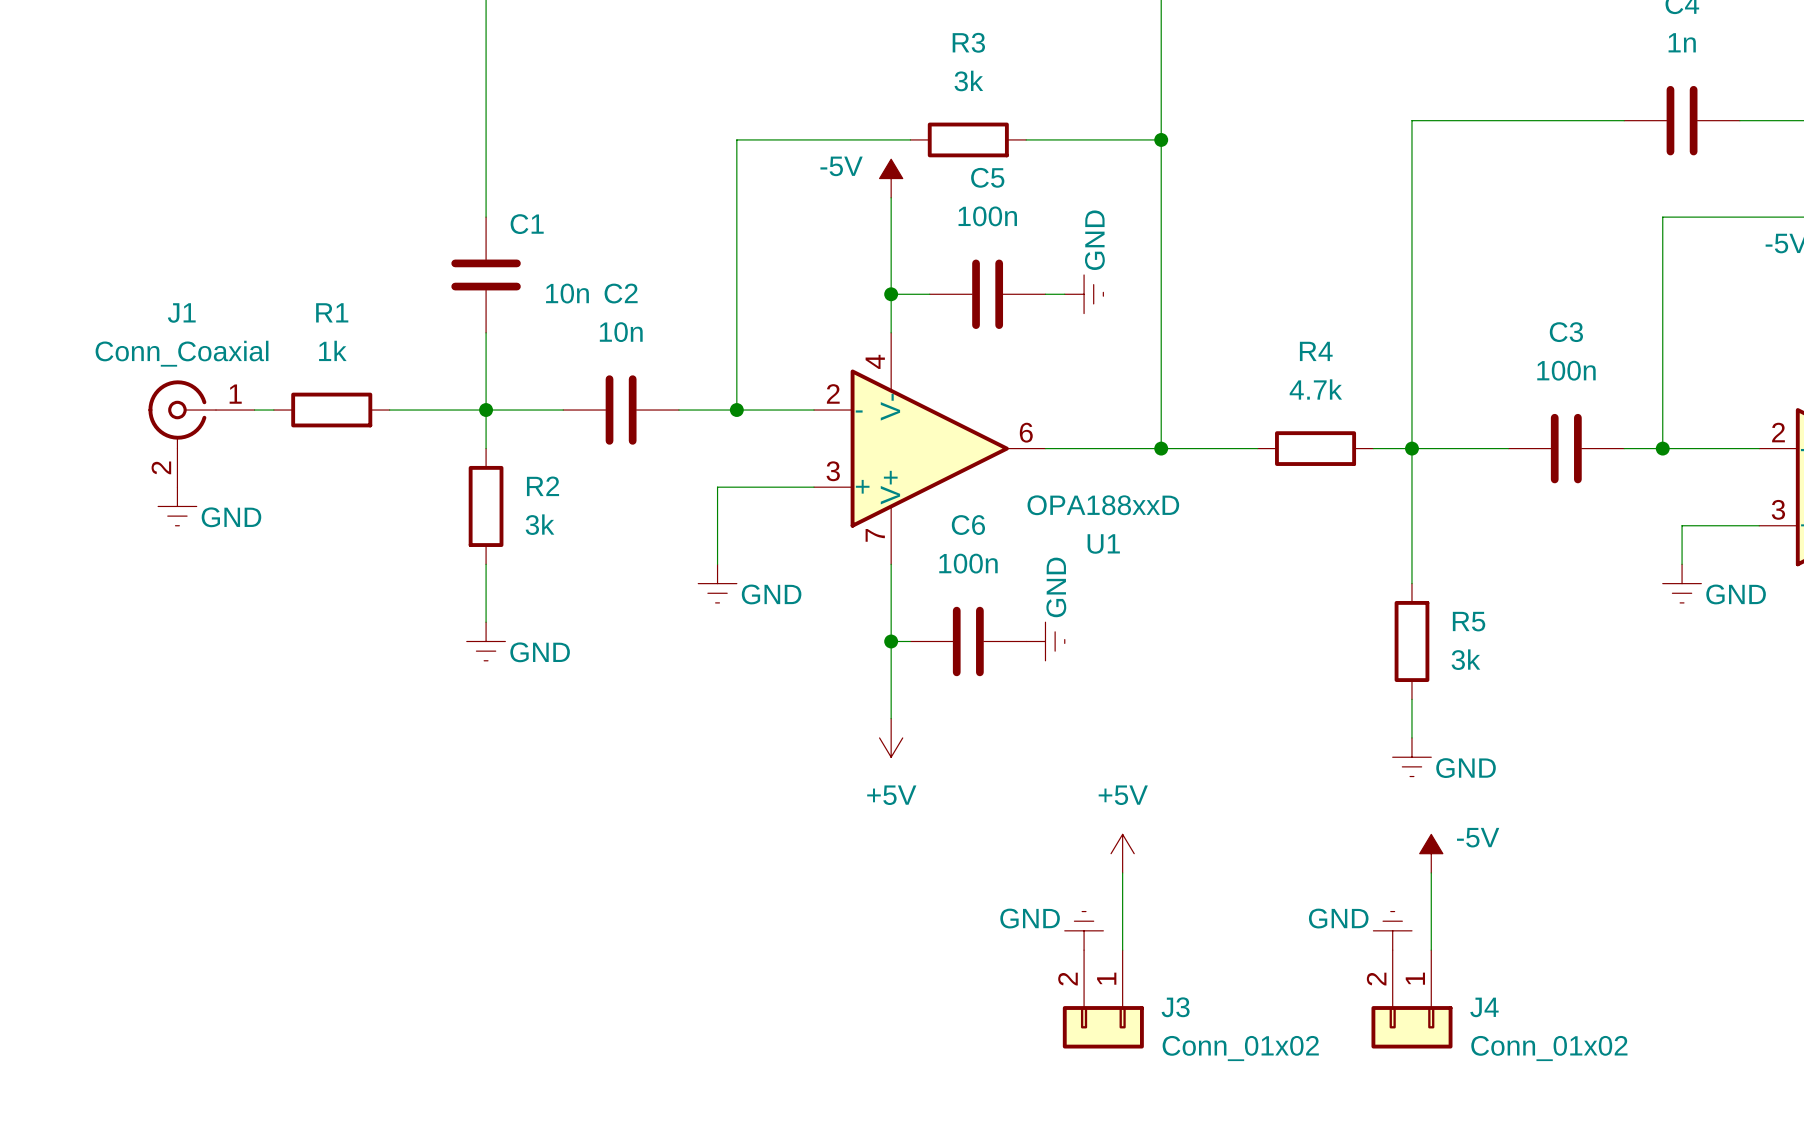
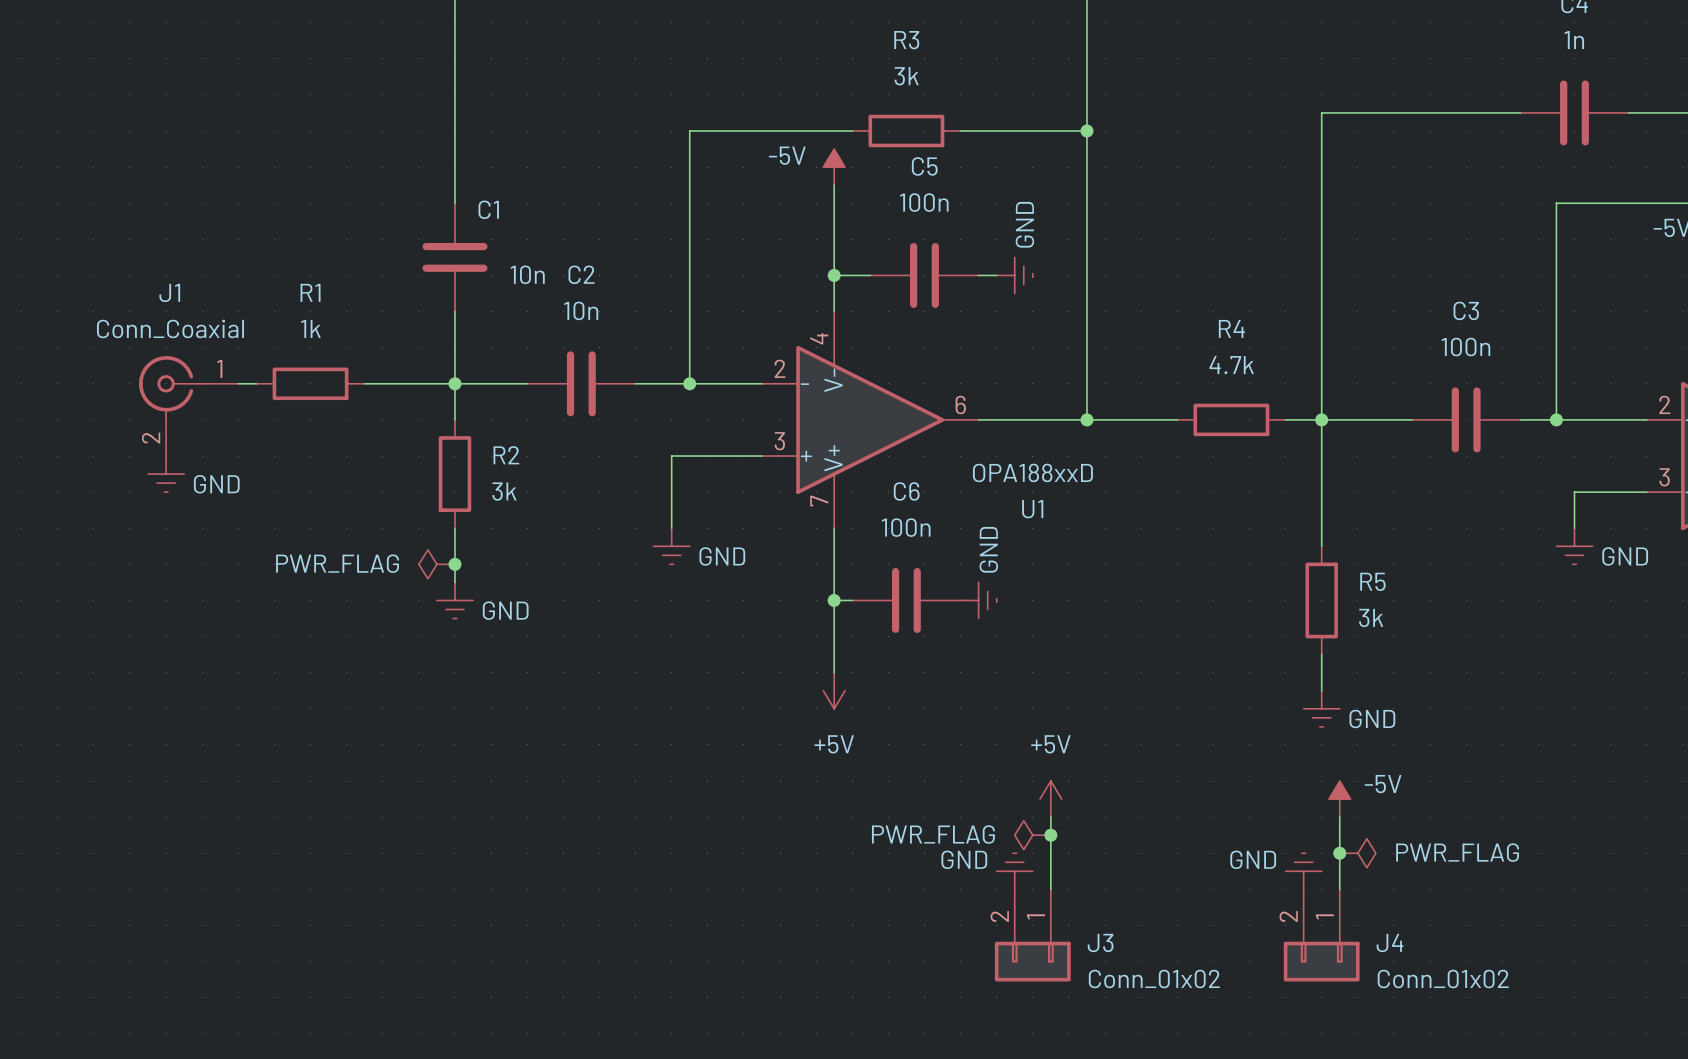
power symbol: none -> PWR_FLAG (436, 564)
junction: none -> (454, 564)
power symbol: none -> PWR_FLAG (1032, 835)
junction: none -> (1050, 835)
junction: none -> (1339, 853)
power symbol: none -> PWR_FLAG (1357, 853)

